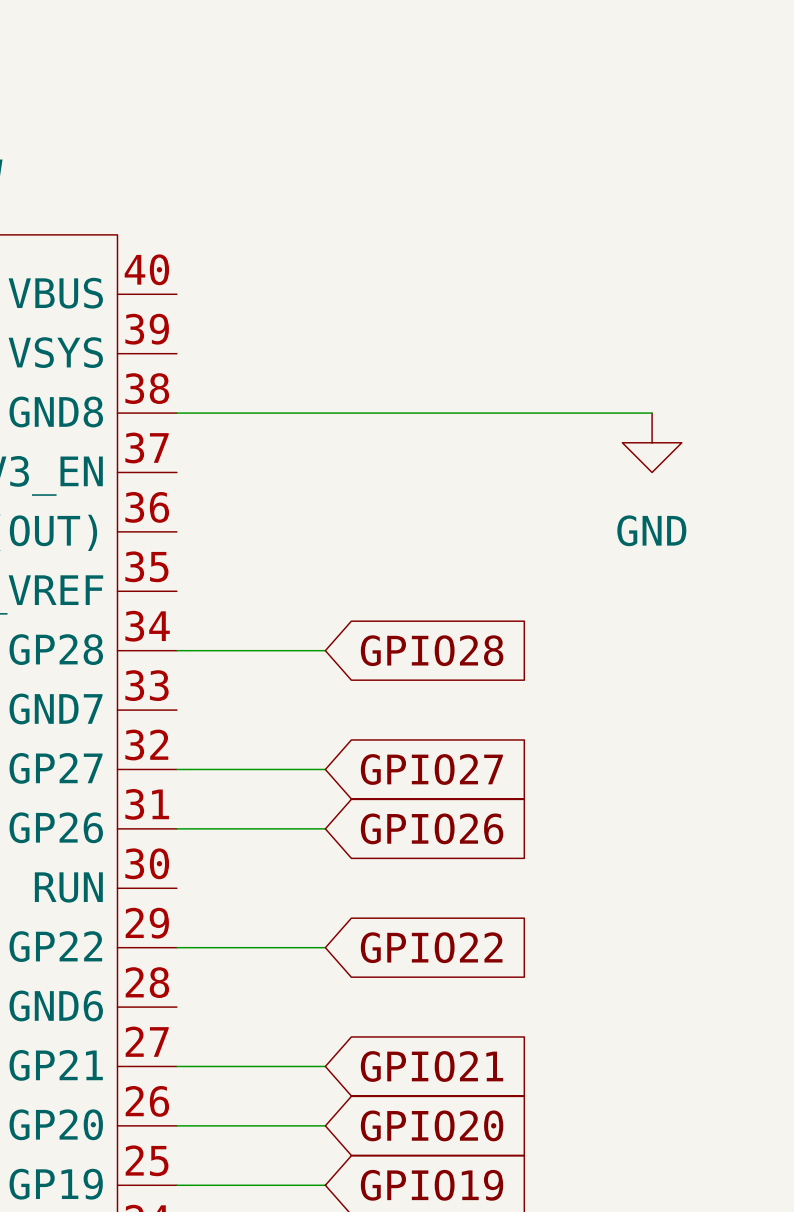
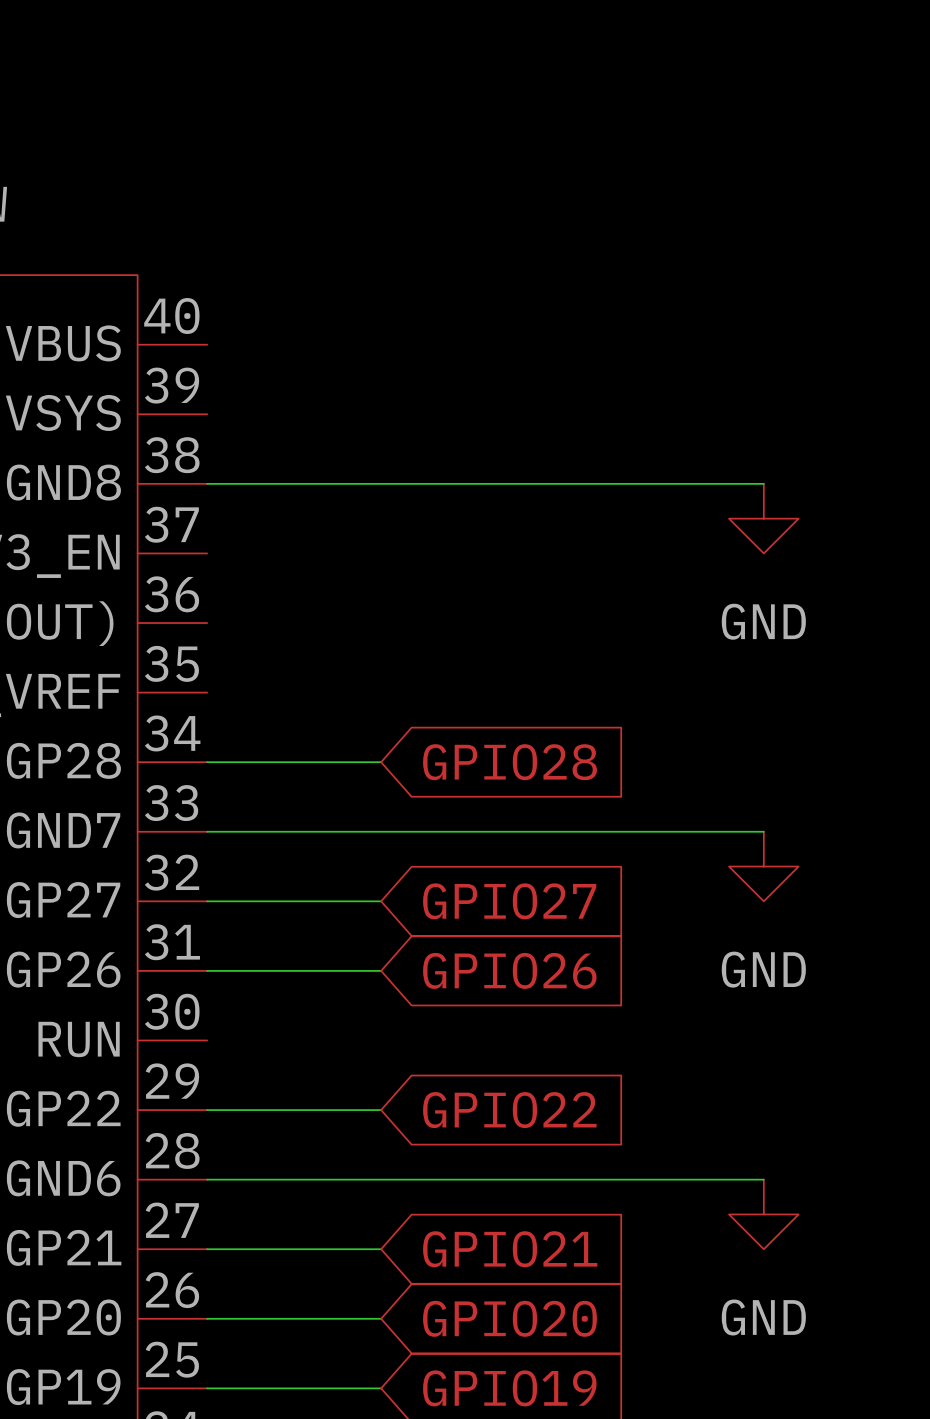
wire: none -> (207, 831) (763, 831)
power symbol: none -> GND (763, 866)
wire: none -> (207, 1179) (763, 1179)
power symbol: none -> GND (763, 1214)

